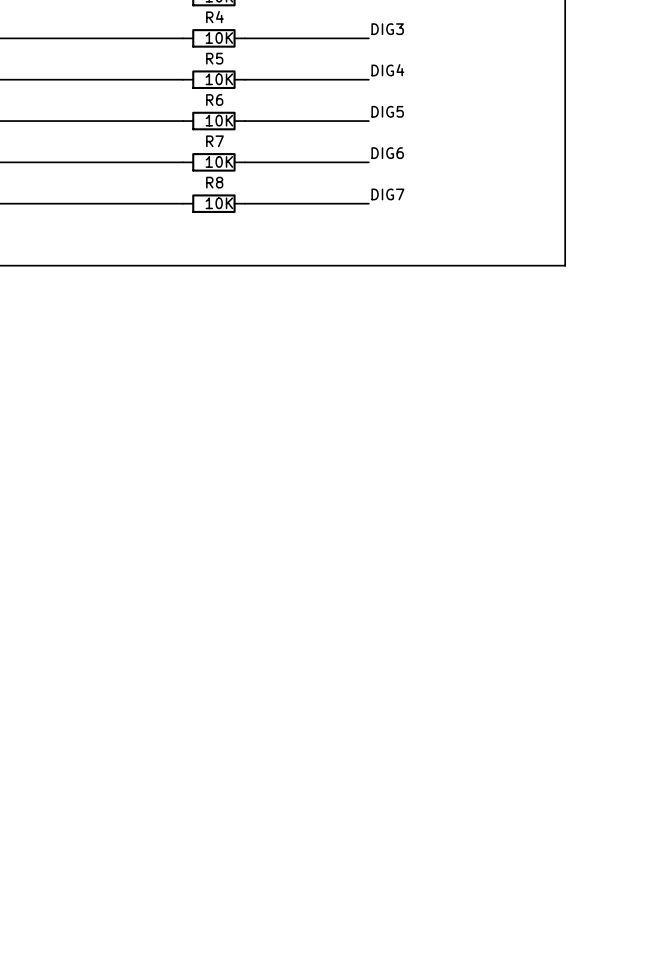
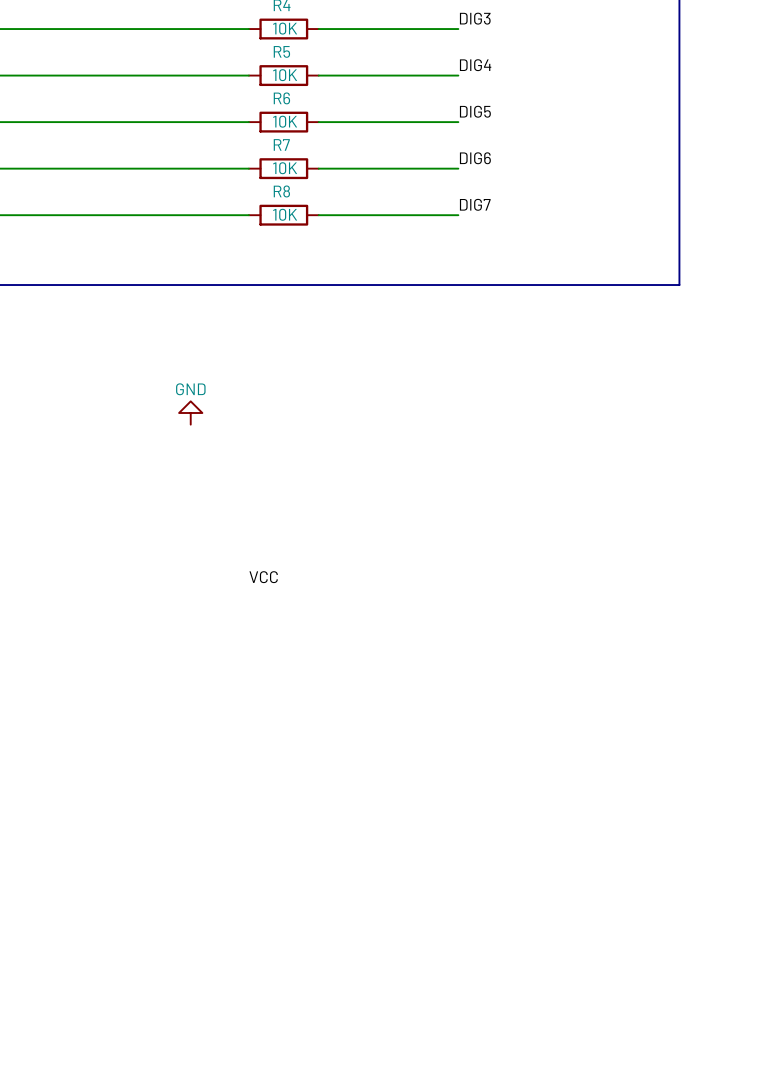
power symbol: none -> GND (190, 413)
label: none -> VCC (263, 577)

